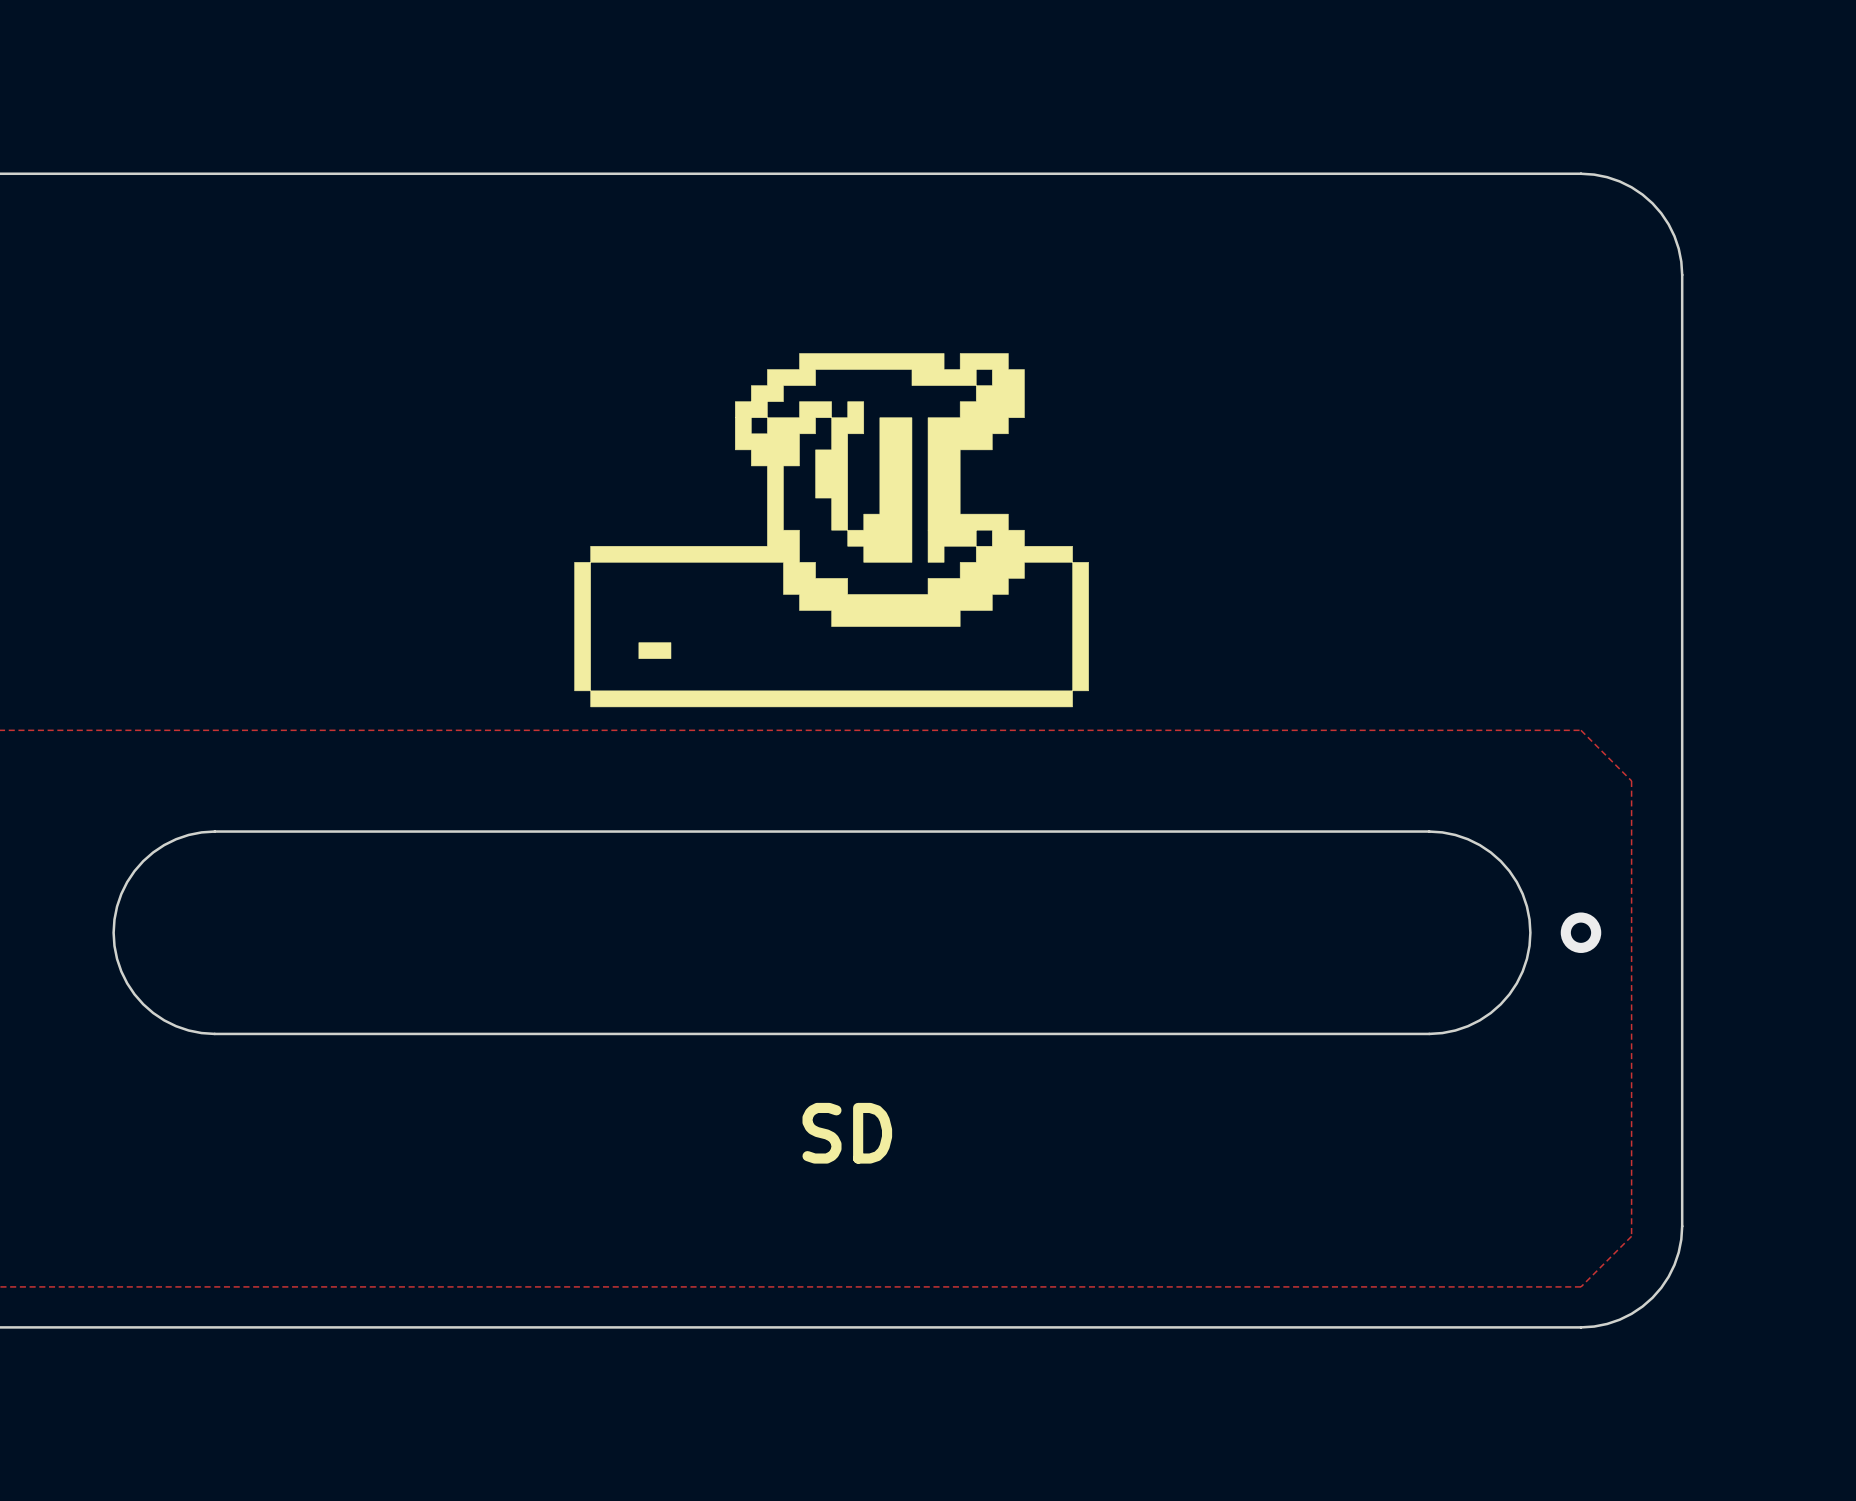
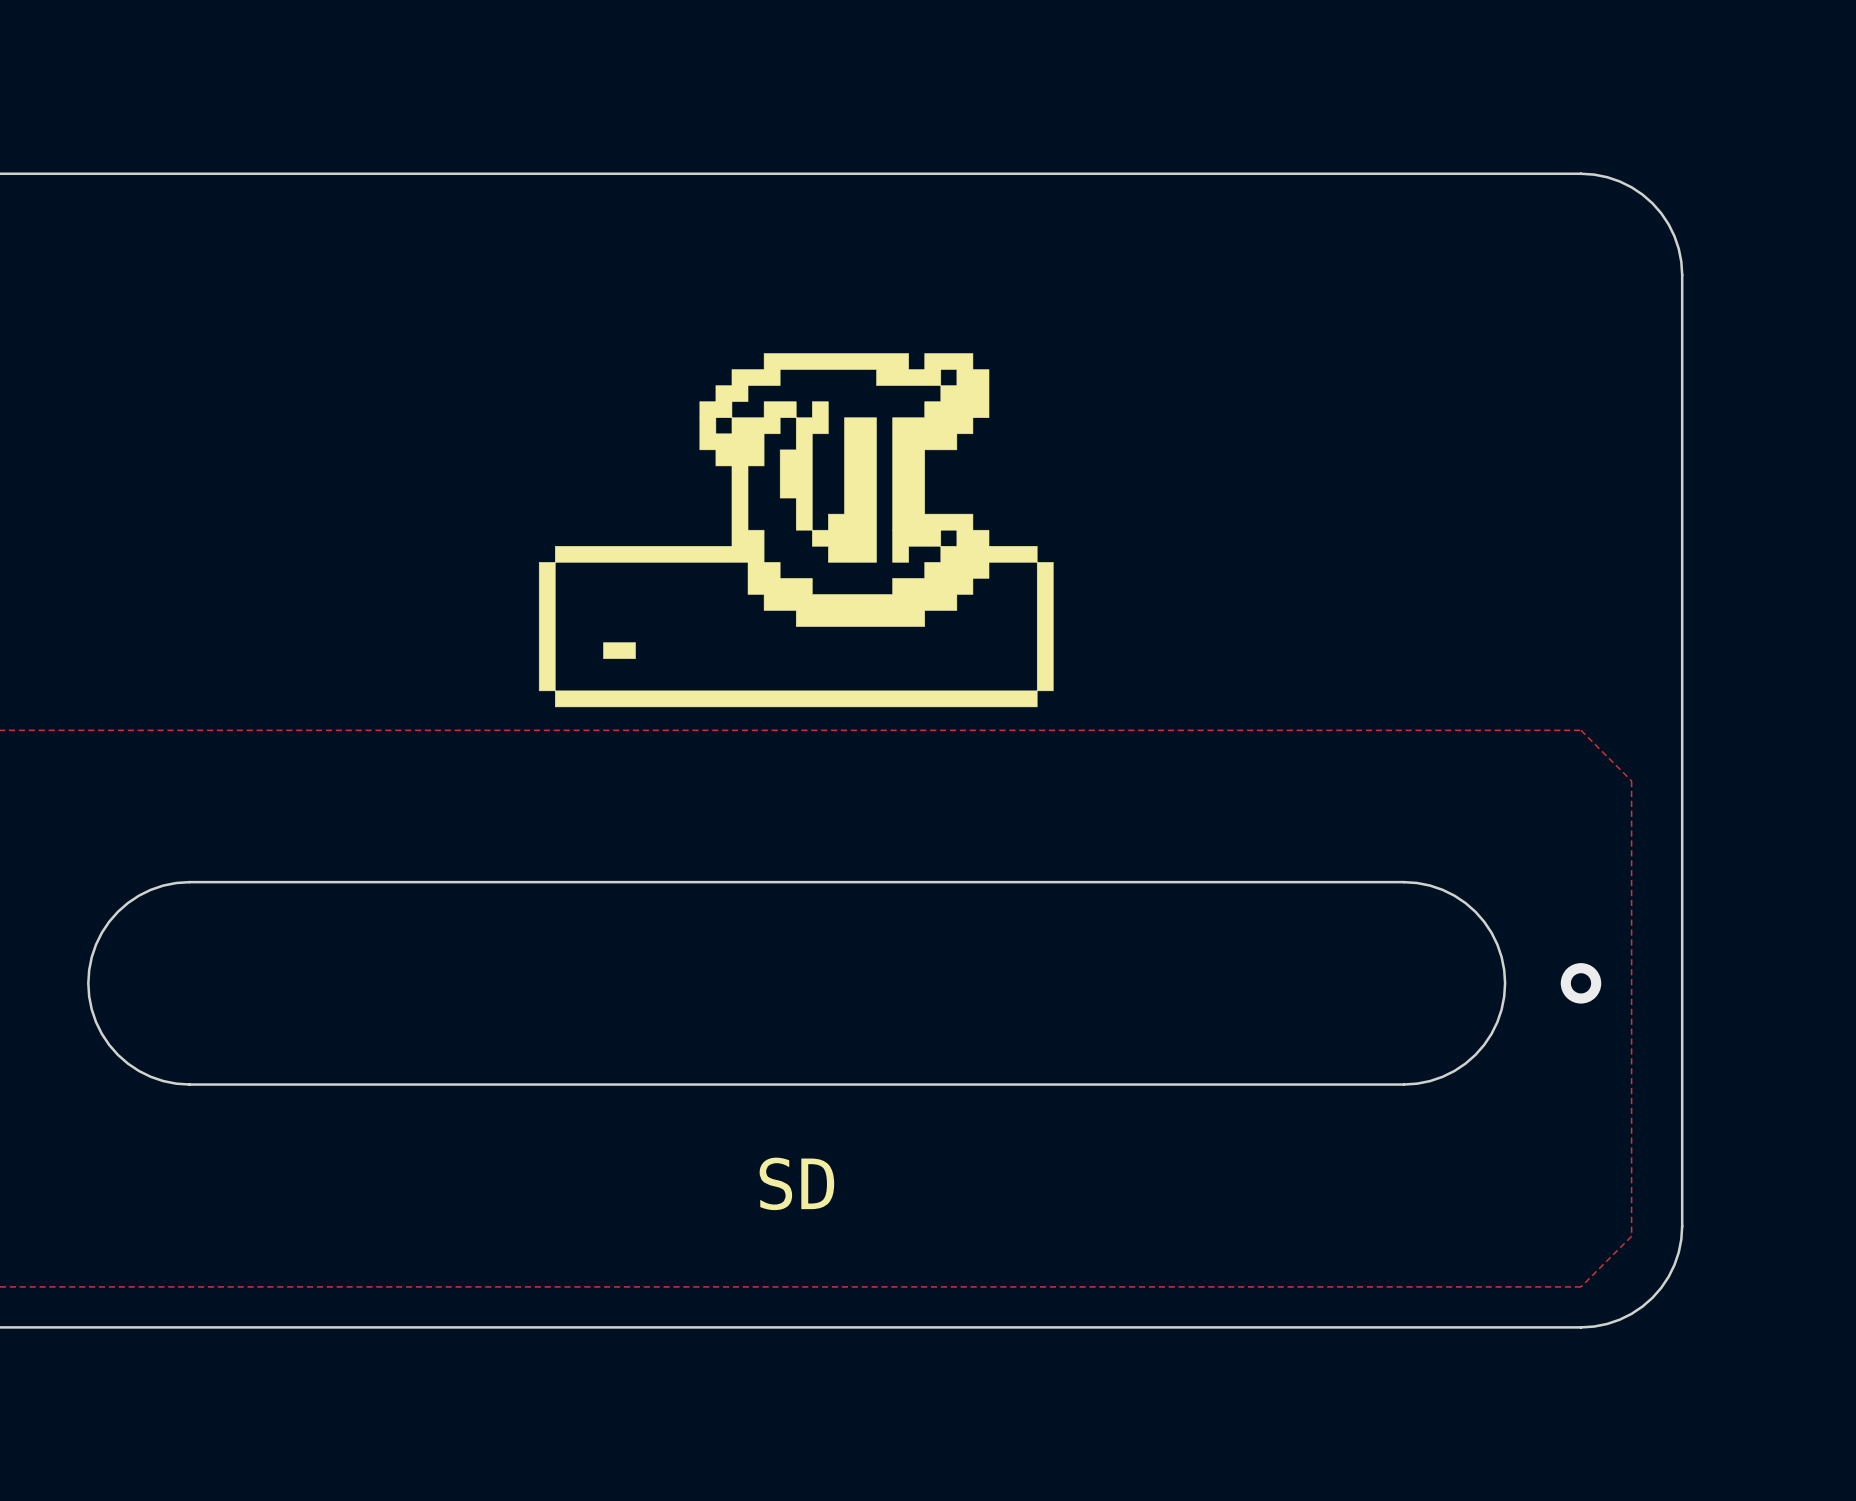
drawing position: (831, 530) -> (796, 530)
board edge: (214, 831) (1442, 832) (1455, 834) (1479, 845) (1490, 852) (1509, 871) (1516, 882) (1526, 906) (1530, 932) (1529, 945) (1522, 971) (1516, 983) (1500, 1004) (1490, 1013) (1467, 1026) (1442, 1033) (201, 1033) (176, 1026) (153, 1013) (143, 1004) (127, 983) (121, 971) (117, 958) (113, 932) (117, 906) (121, 894) (127, 882) (143, 861) (153, 852) (176, 839) (188, 834) (214, 831) -> (189, 882) (1417, 883) (1430, 885) (1454, 895) (1465, 903) (1484, 921) (1491, 932) (1501, 957) (1505, 983) (1504, 996) (1497, 1022) (1491, 1033) (1475, 1054) (1465, 1063) (1442, 1076) (1417, 1083) (176, 1083) (150, 1076) (127, 1063) (117, 1054) (101, 1033) (96, 1022) (91, 1009) (88, 983) (91, 957) (96, 944) (101, 932) (117, 911) (127, 903) (150, 889) (163, 885) (189, 882)
via position: (1580, 932) -> (1580, 983)
text position: SD (847, 1133) -> SD (796, 1183)

